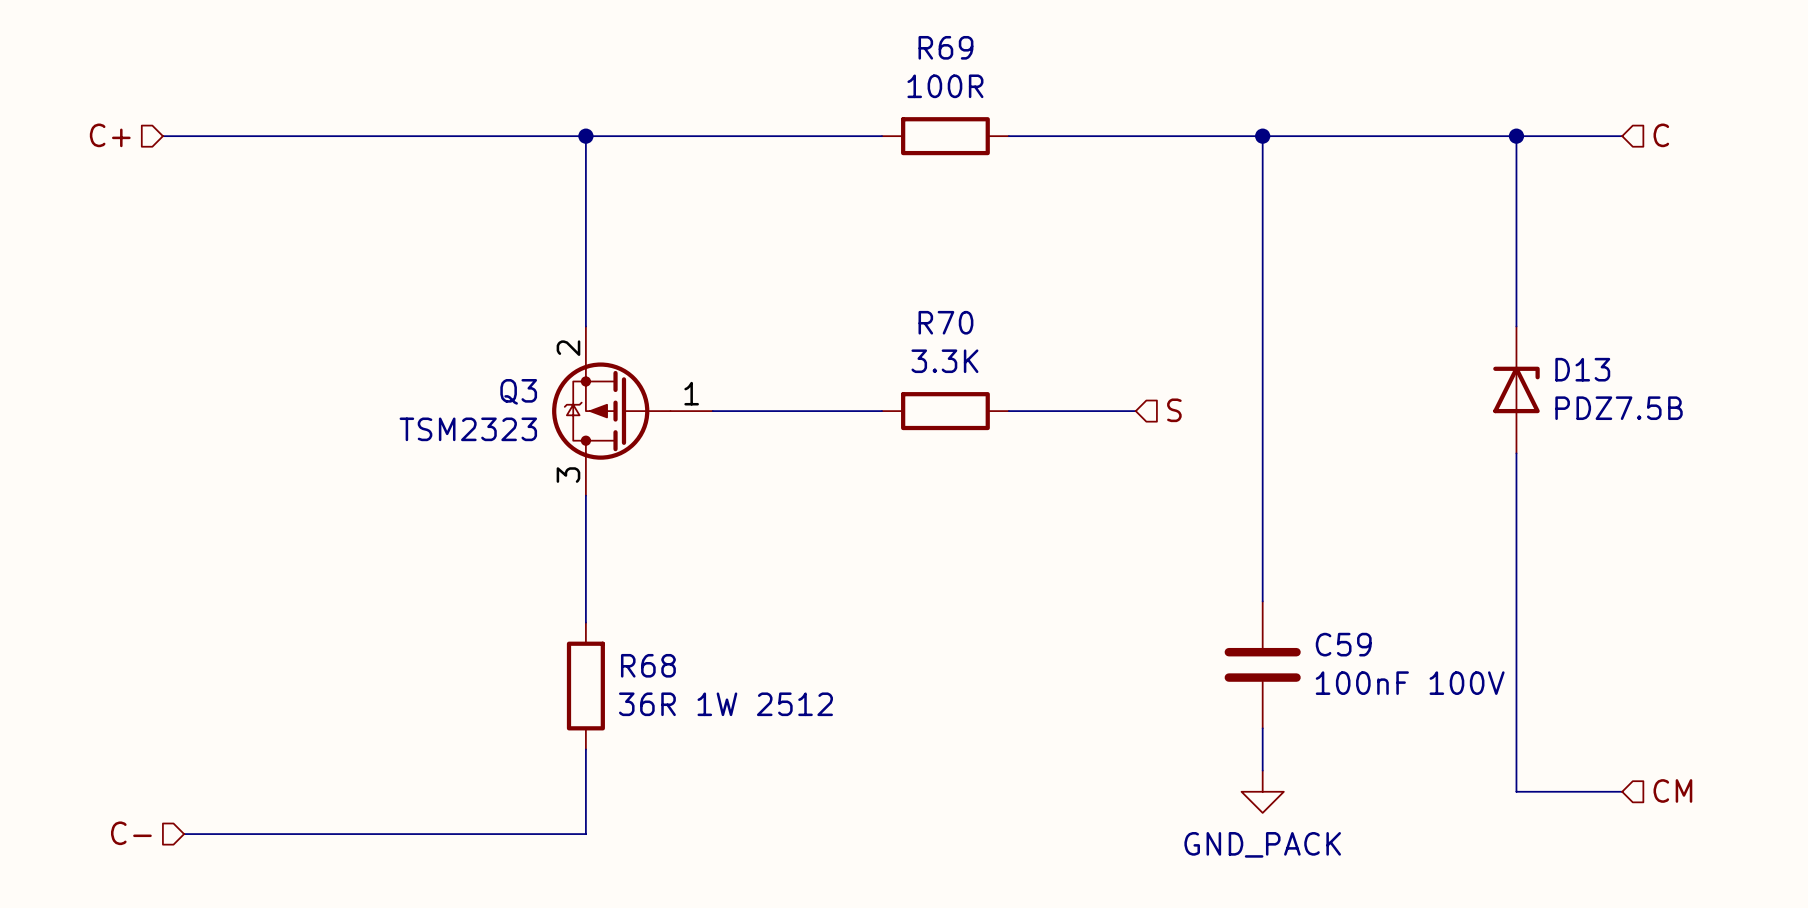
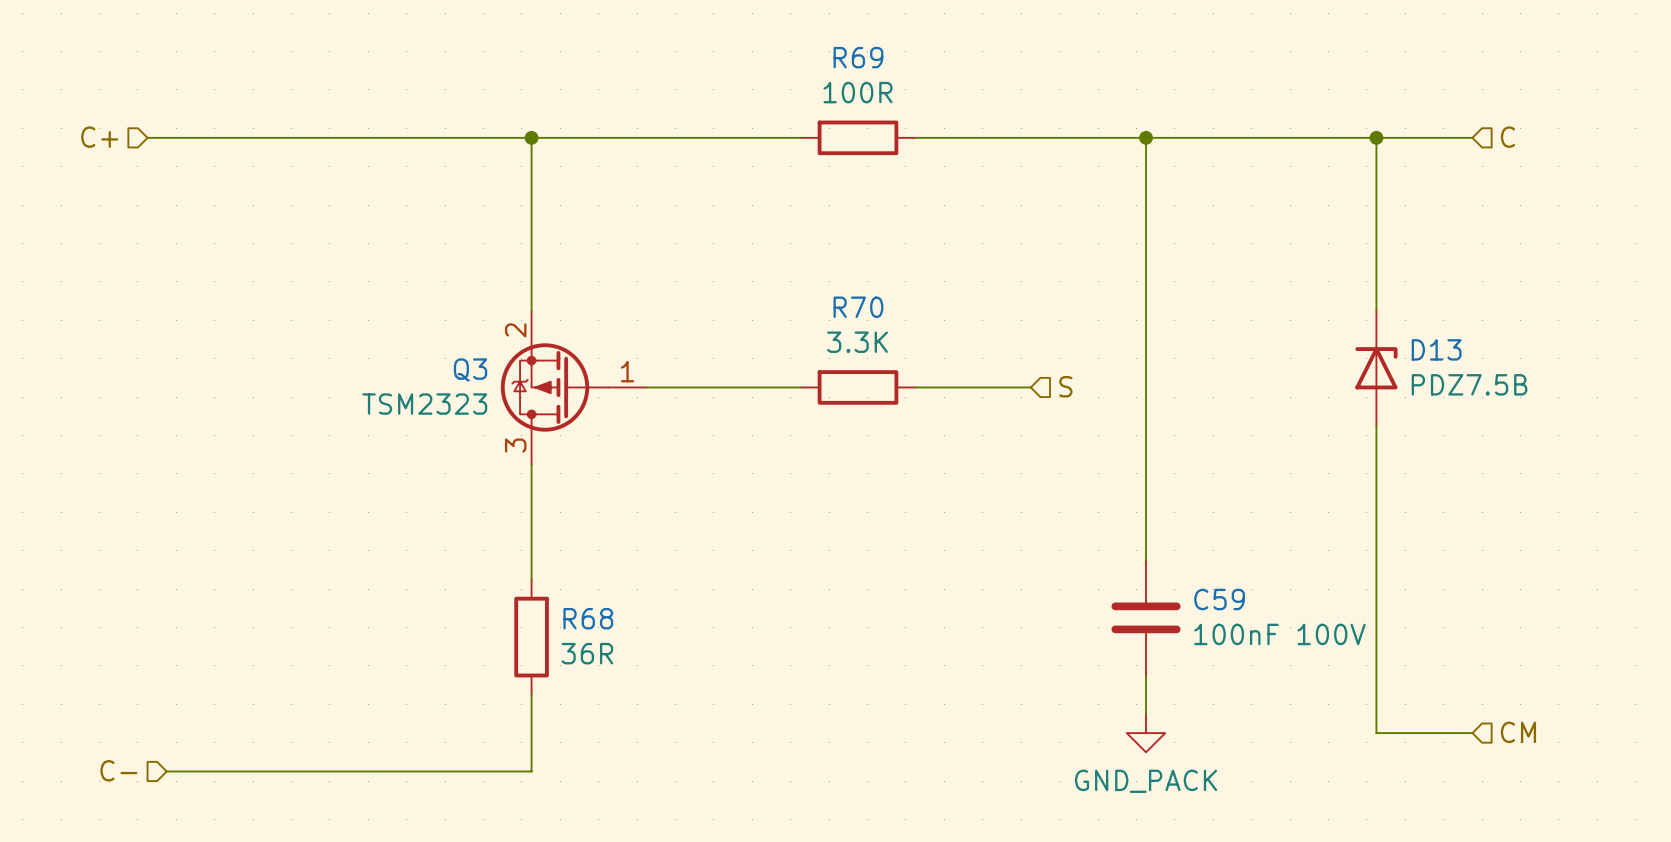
R68 value: 36R 1W 2512 (725, 704) -> 36R (587, 653)

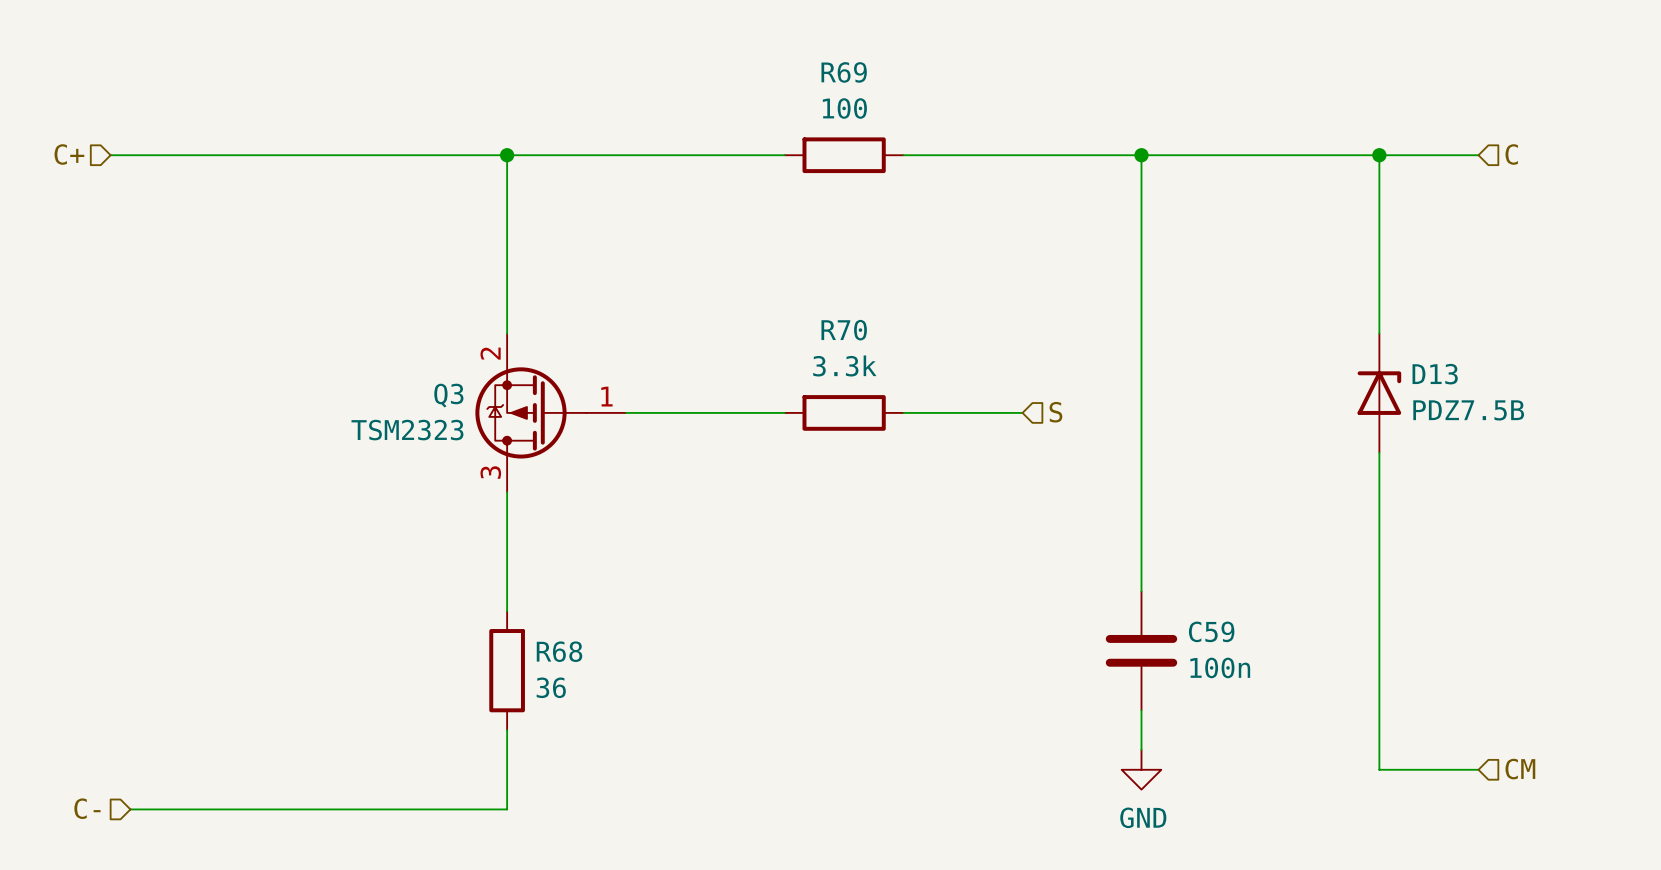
R69 value: 100R (857, 92) -> 100 (844, 108)
R70 value: 3.3K (857, 342) -> 3.3k (844, 365)
C59 value: 100nF 100V (1279, 634) -> 100n (1220, 667)
R68 value: 36R (587, 653) -> 36 (551, 687)
power symbol: GND_PACK (1146, 733) -> GND (1141, 769)

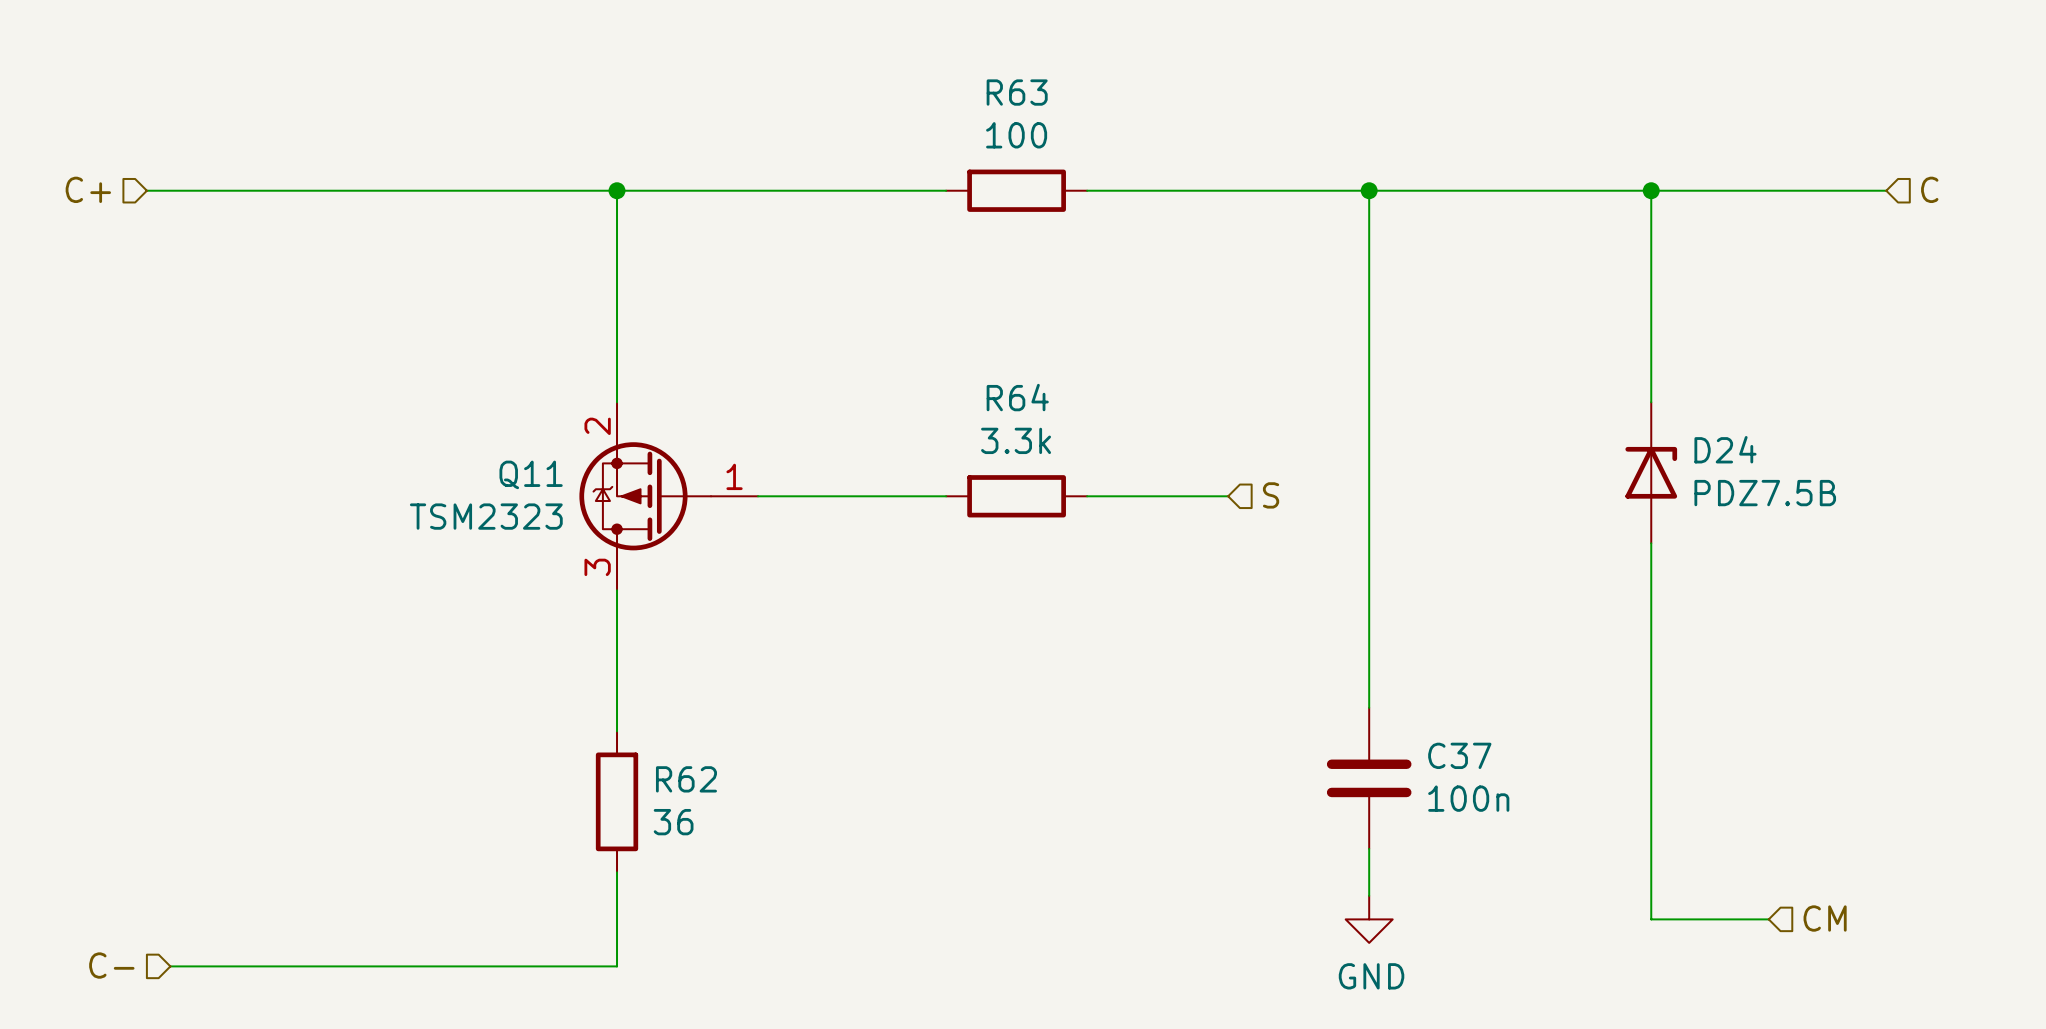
R69 name: R69 (844, 72) -> R63 (1017, 92)
hierarchical label position: C (1511, 154) -> C (1929, 189)
wire: none -> (1768, 190) (1886, 190)
R70 name: R70 (844, 330) -> R64 (1017, 397)
D13 name: D13 (1435, 374) -> D24 (1725, 449)
Q3 name: Q3 (448, 395) -> Q11 (531, 474)
C59 name: C59 (1211, 631) -> C37 (1459, 755)
R68 name: R68 (559, 651) -> R62 (686, 779)

